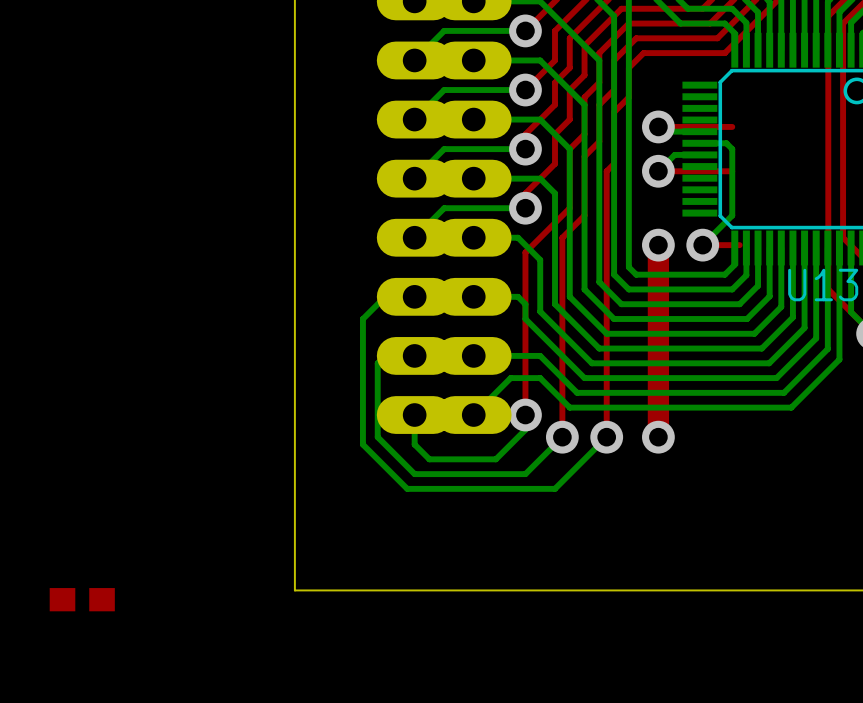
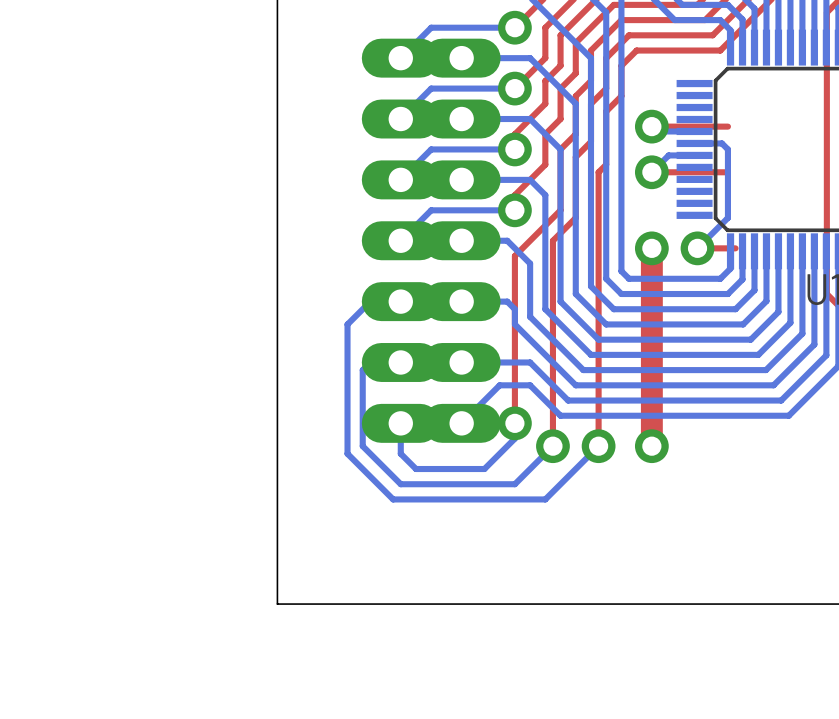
part: (82, 599) -> none

